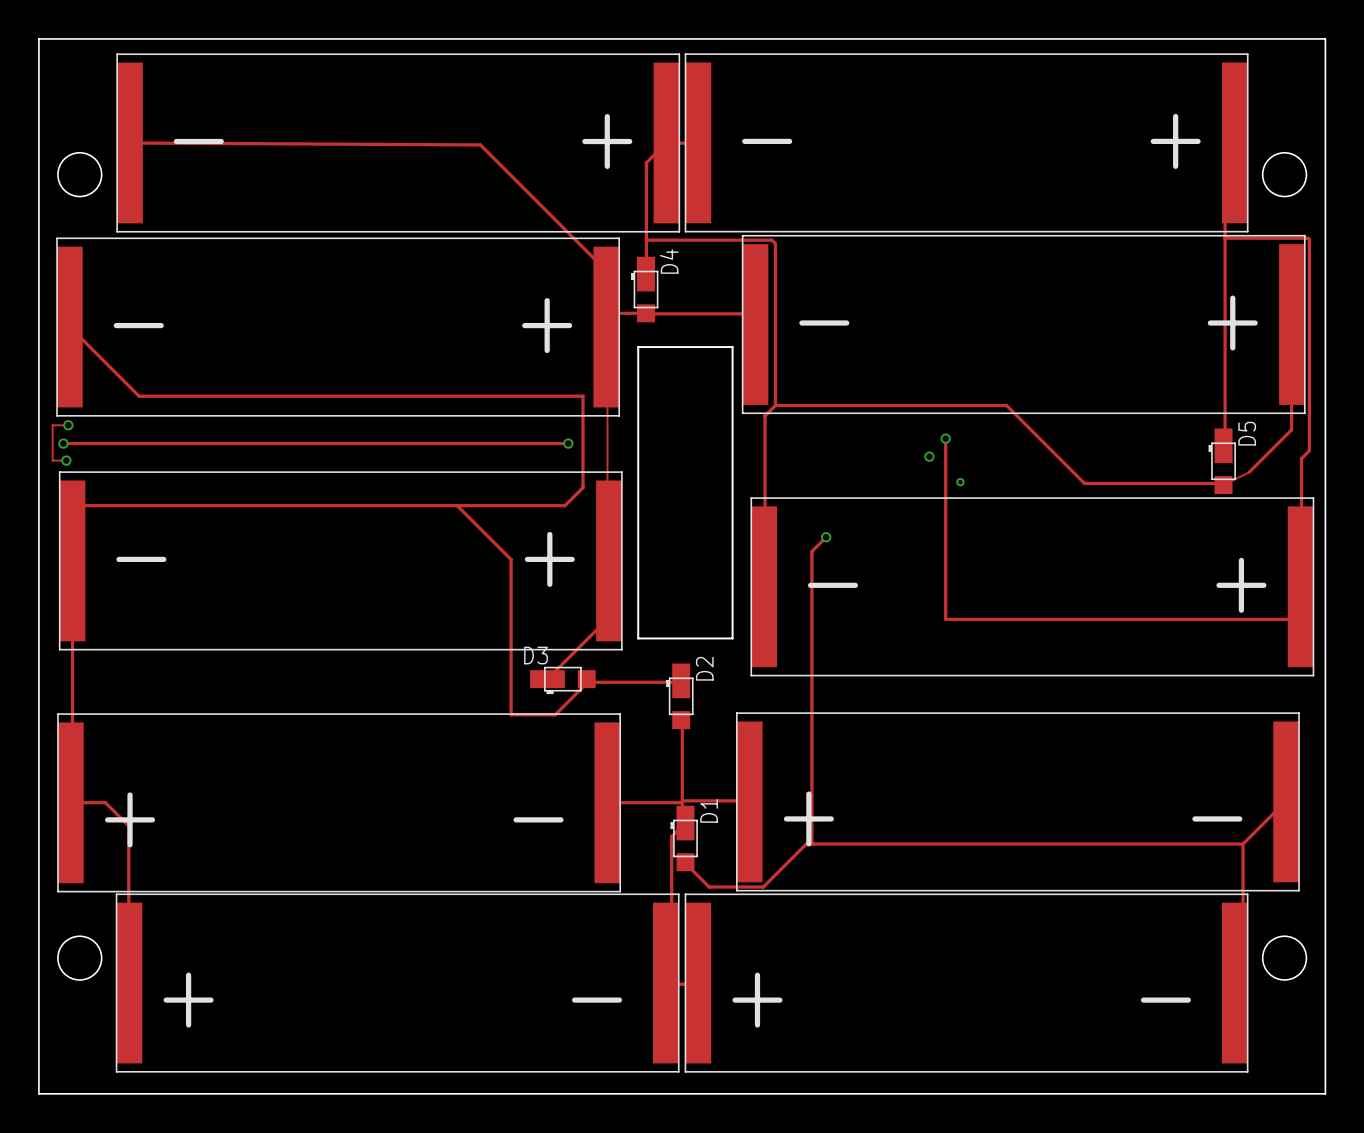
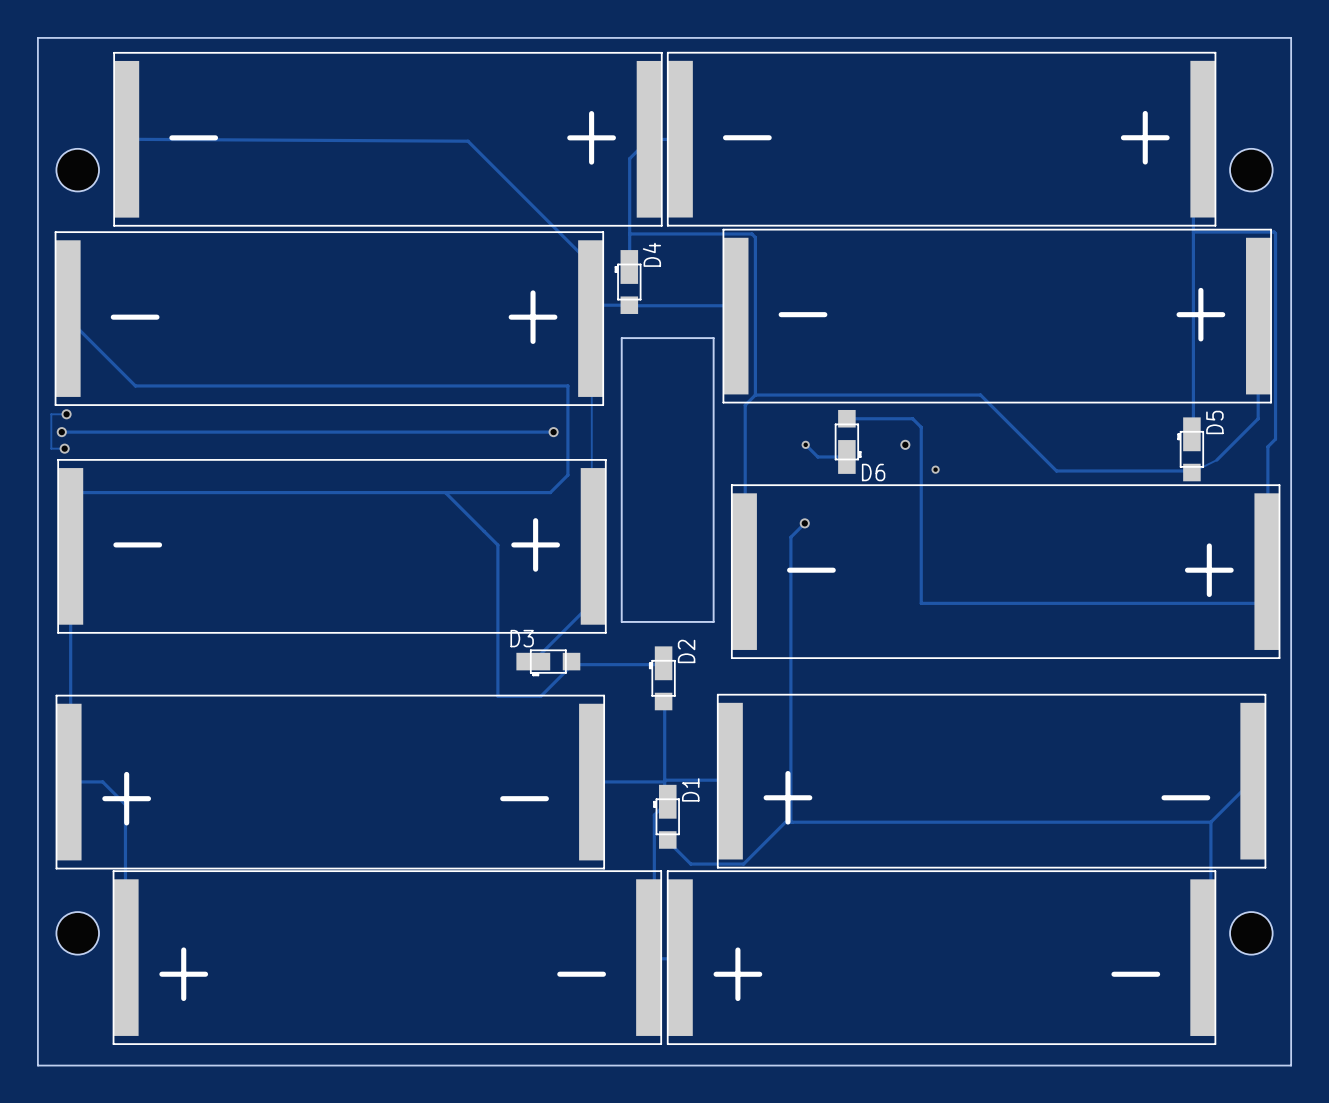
track: none -> (846, 418) (912, 418) (921, 427)
via: (945, 438) -> none
D6: none -> (848, 441)
track: none -> (805, 444) (817, 456) (846, 456)
via: none -> (805, 444)

